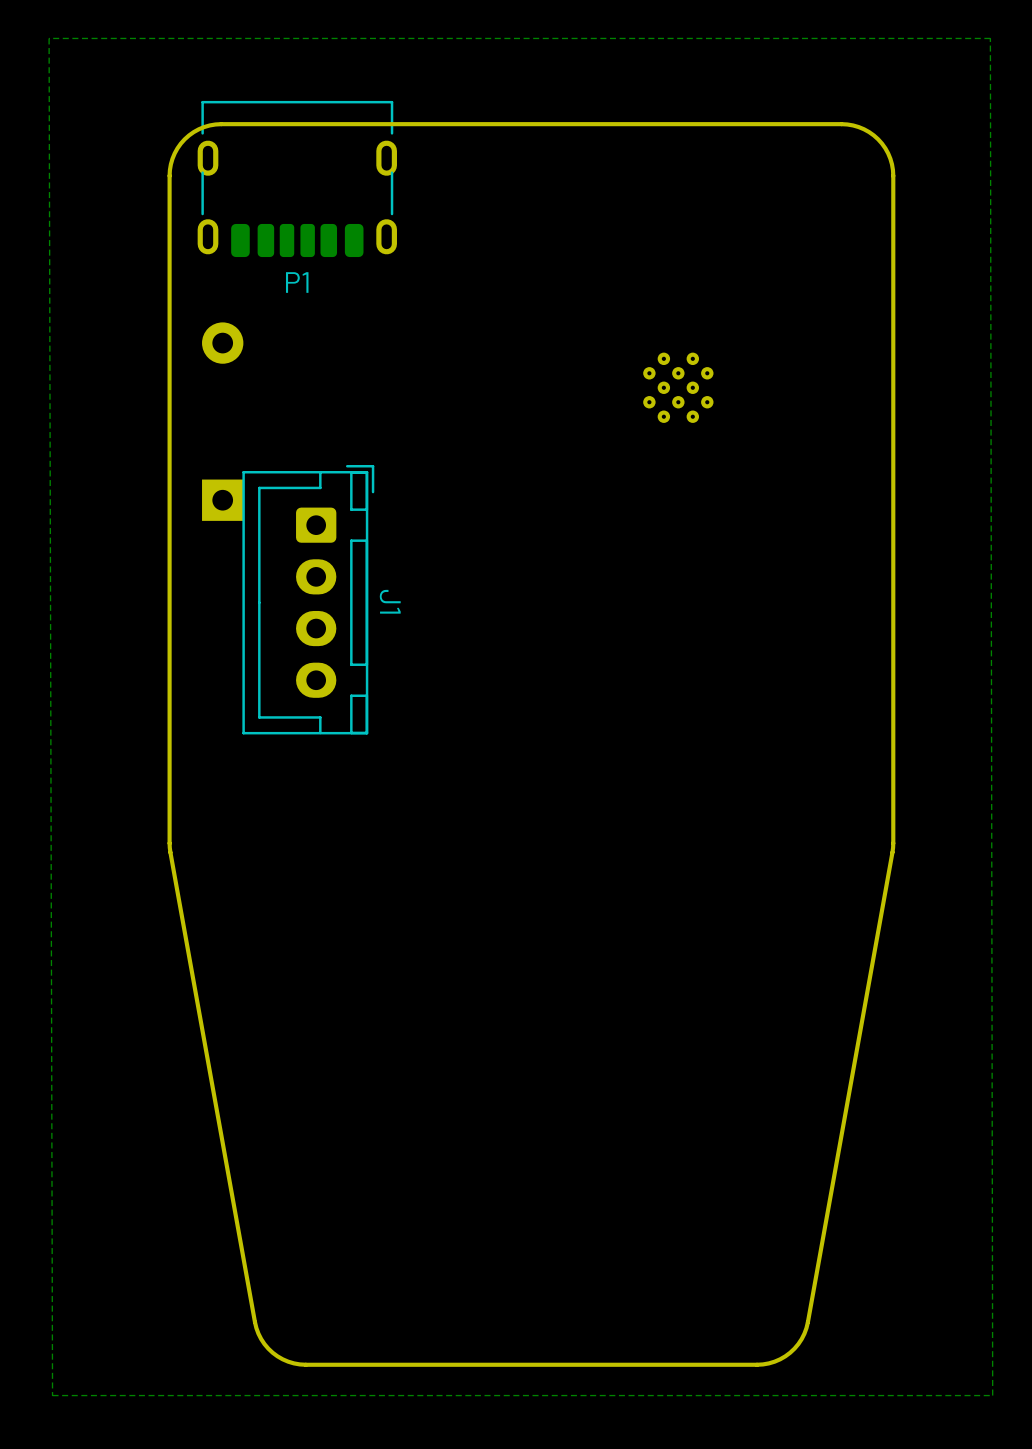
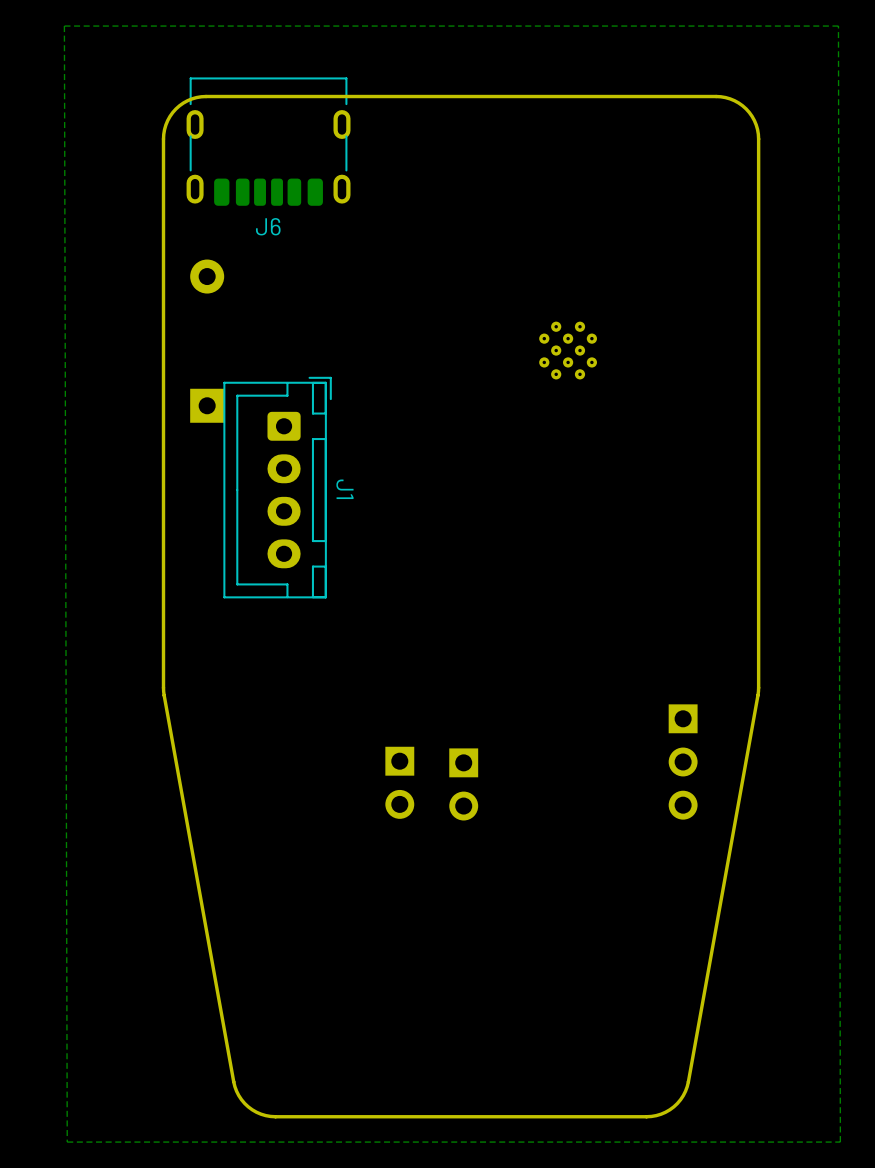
P1 name: P1 (297, 282) -> J6 (268, 226)
part position: (678, 387) -> (568, 350)
part: none -> (683, 761)
part: none -> (399, 782)
part: none -> (463, 784)

